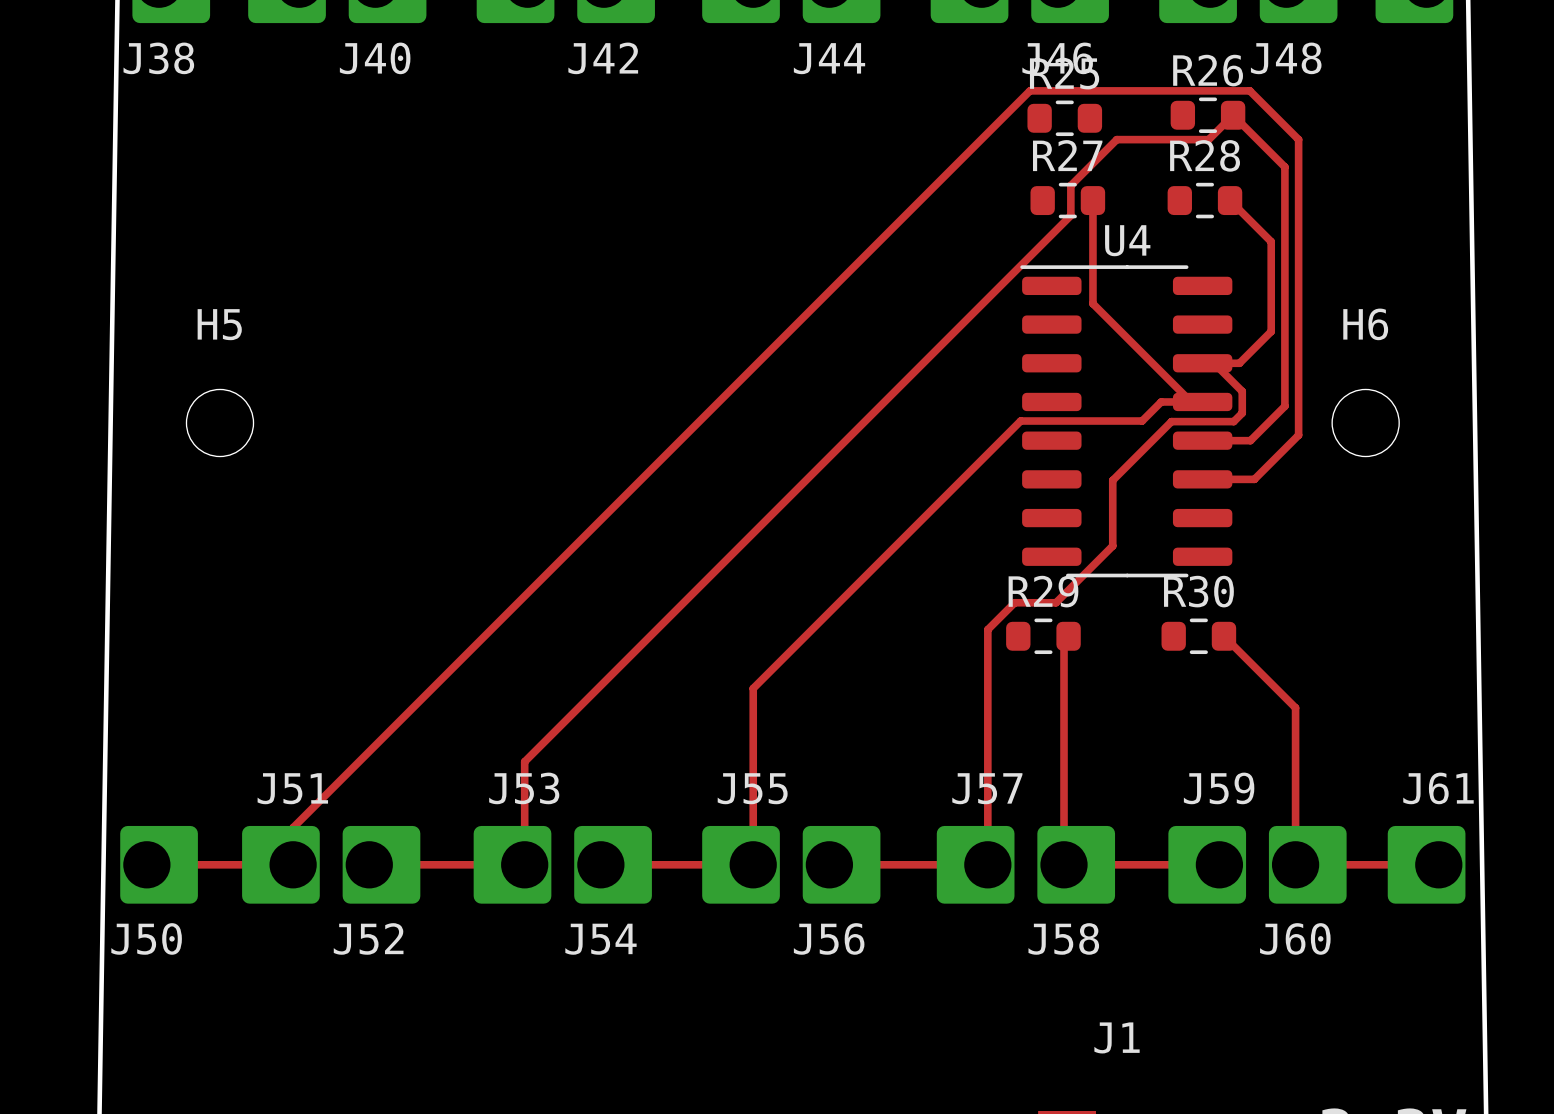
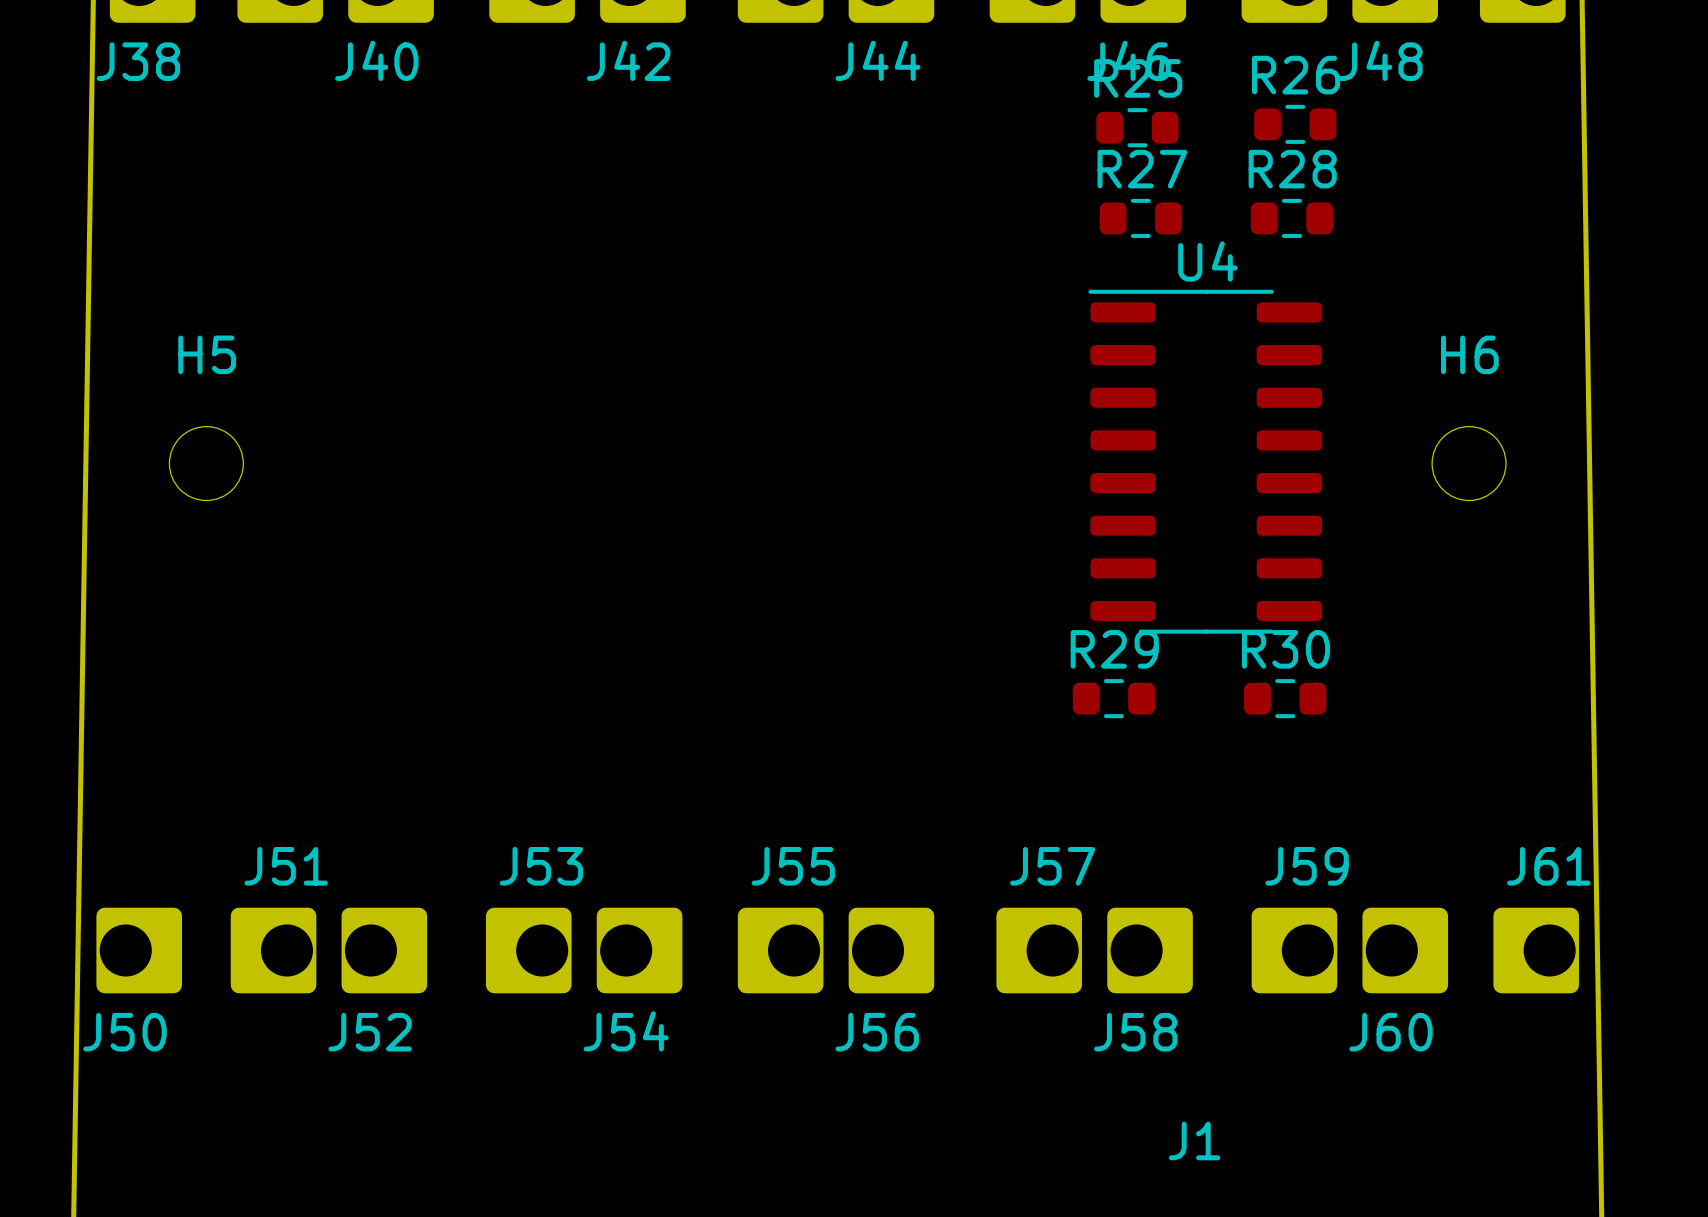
track: (1092, 200) (1092, 303) (1191, 401) -> none
track: (1230, 200) (1271, 241) (1271, 331) (1239, 363) (1202, 363) -> none
track: (1214, 363) (1242, 391) (1242, 413) (1233, 421) (1171, 421) (1112, 480) (1112, 545) (1055, 602) (1014, 602) (987, 629) (987, 864) (829, 864) -> none
track: (1202, 401) (1161, 401) (1142, 421) (1020, 421) (753, 688) (753, 864) (600, 864) -> none
track: (1202, 440) (1250, 440) (1284, 406) (1284, 167) (1233, 115) (1208, 139) (1116, 139) (1070, 185) (1070, 215) (524, 761) (524, 864) (369, 864) -> none
track: (1202, 479) (1254, 479) (1298, 435) (1298, 139) (1249, 90) (1029, 90) (293, 827) (293, 864) (146, 864) -> none
track: (1068, 636) (1064, 640) (1064, 864) (1219, 864) -> none
track: (1223, 636) (1295, 707) (1295, 864) (1438, 864) -> none

